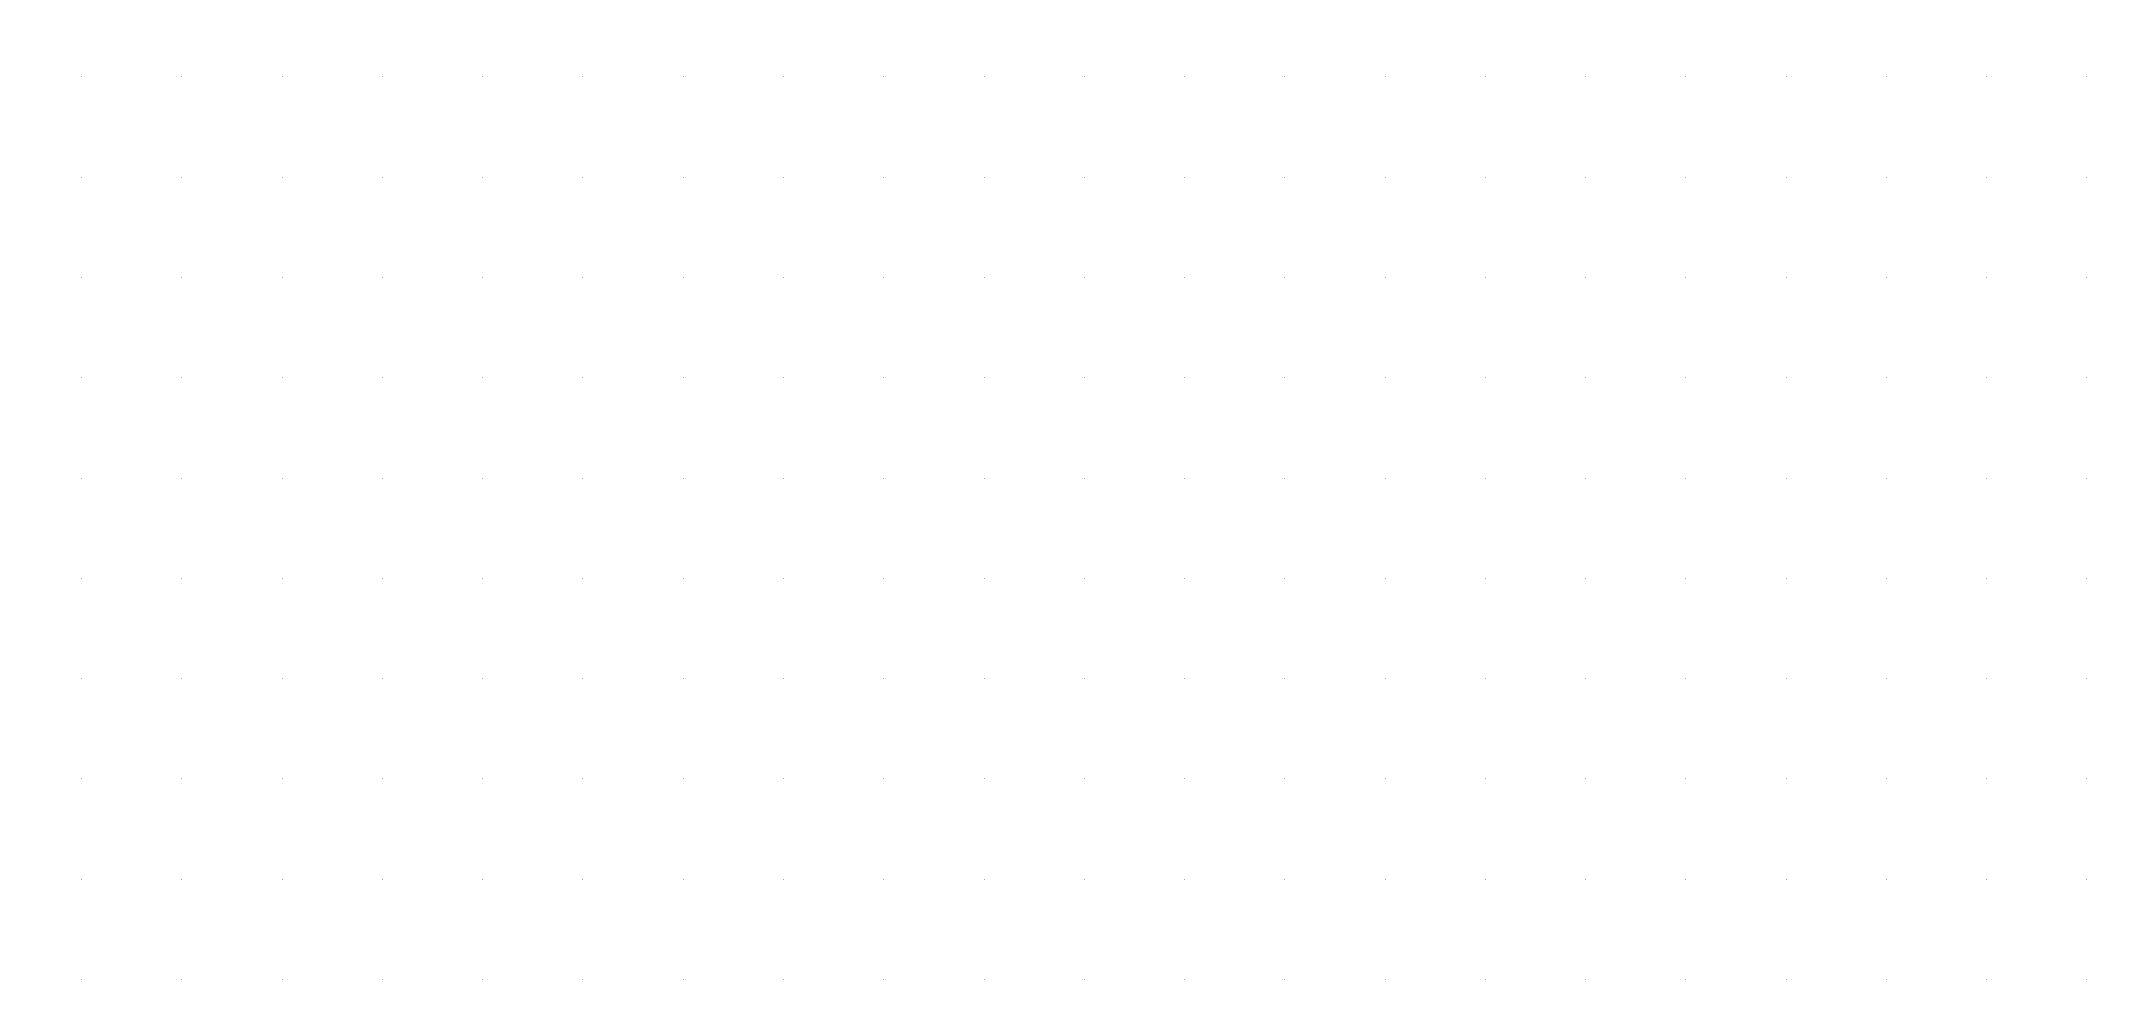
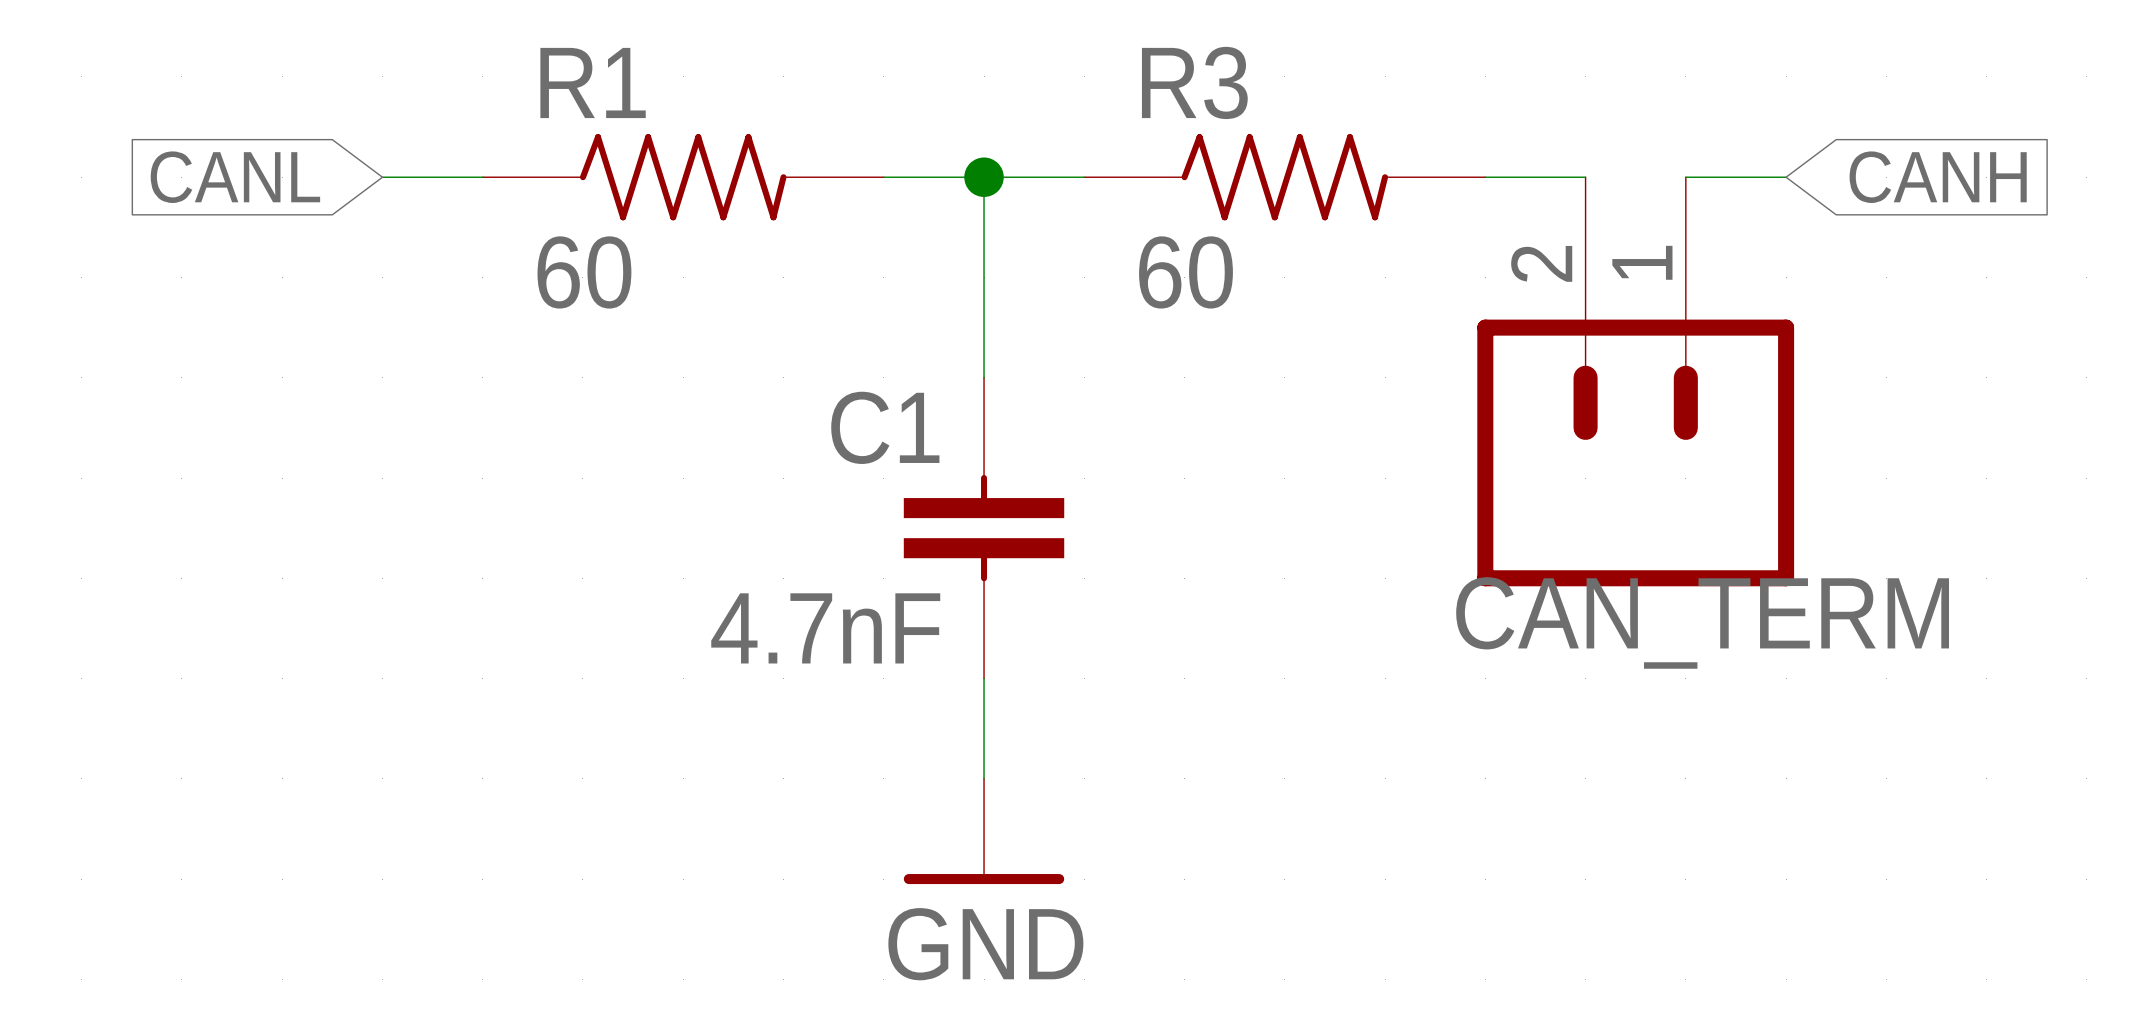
global label: none -> CANL (235, 177)
wire: none -> (382, 177) (482, 177)
R1: none -> 60 (683, 177)
wire: none -> (883, 177) (1084, 177)
wire: none -> (984, 177) (984, 377)
junction: none -> (984, 177)
R3: none -> 60 (1284, 177)
wire: none -> (1485, 177) (1585, 177)
wire: none -> (1685, 177) (1786, 177)
global label: none -> CANH (1938, 177)
CAN_TERM: none -> (1635, 381)
C1: none -> 4.7nF (984, 528)
wire: none -> (984, 678) (984, 778)
power symbol: none -> GND (984, 831)

